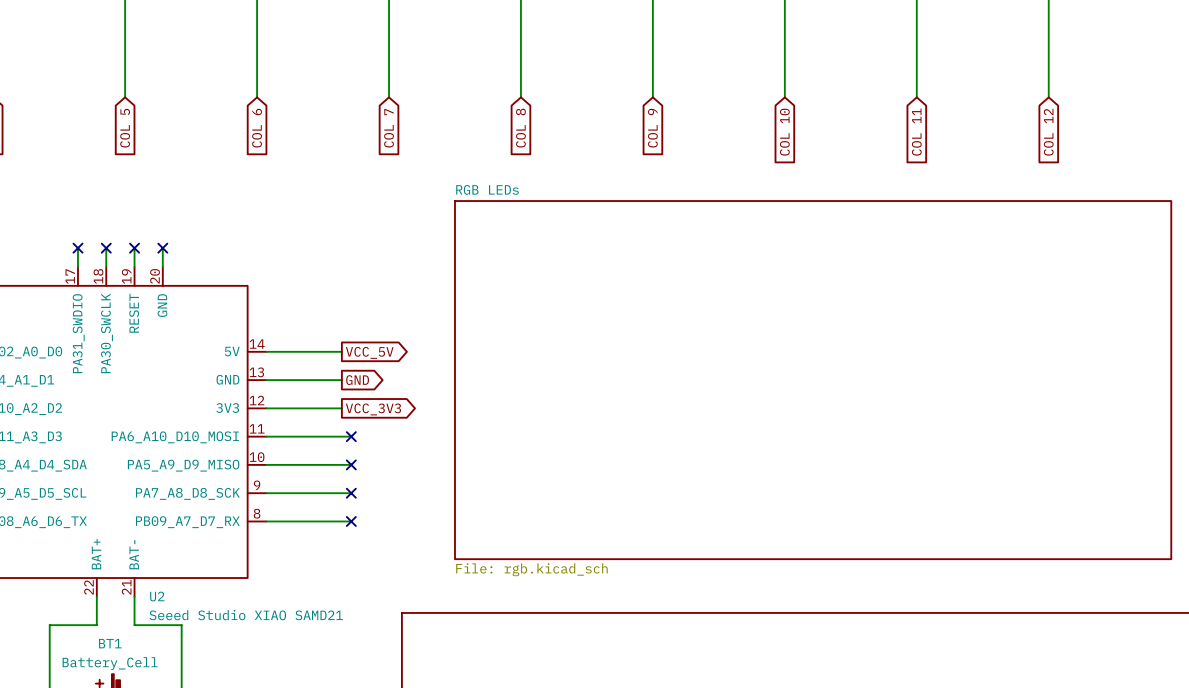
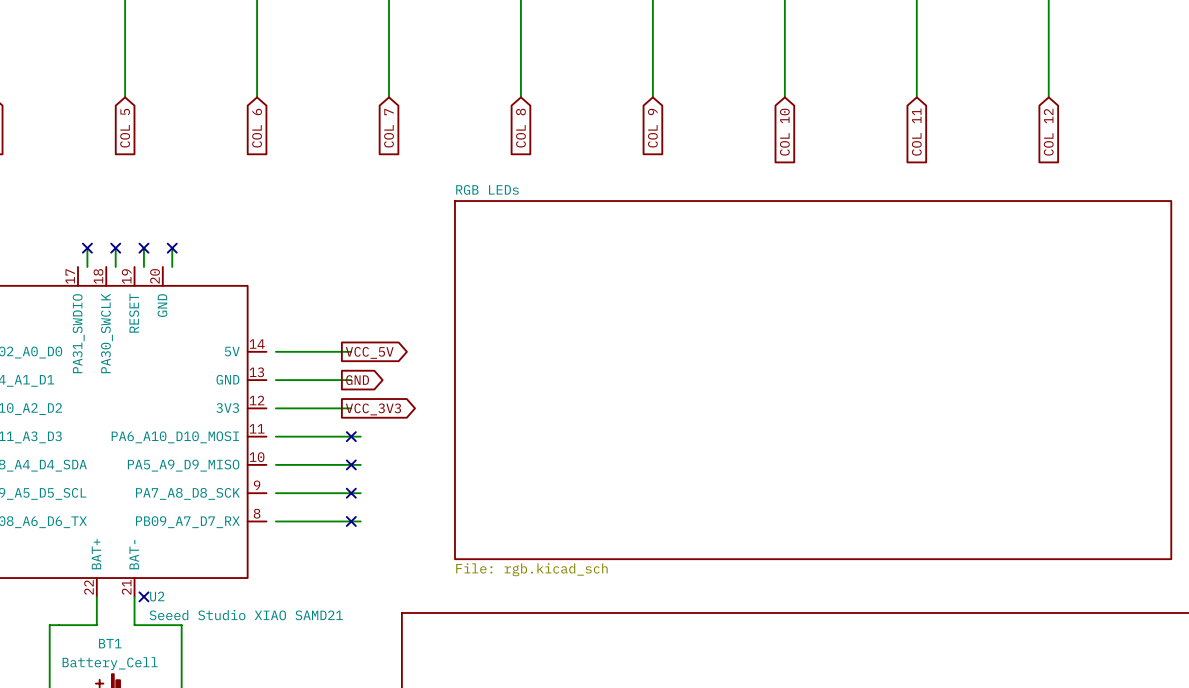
wire: (77, 248) (77, 267) -> (143, 248) (143, 267)
no-connect mark: (77, 248) -> none
no-connect mark: none -> (87, 248)
wire: (106, 248) (106, 267) -> (172, 248) (172, 267)
no-connect mark: (106, 248) -> none
no-connect mark: none -> (115, 248)
wire: (134, 248) (134, 267) -> (115, 248) (115, 267)
no-connect mark: (134, 248) -> none
no-connect mark: none -> (143, 248)
wire: (162, 248) (162, 267) -> (87, 248) (87, 267)
no-connect mark: (162, 248) -> none
no-connect mark: none -> (172, 248)
wire: (266, 351) (275, 351) -> (341, 351) (351, 351)
wire: (266, 380) (275, 380) -> (341, 380) (351, 380)
wire: (266, 408) (275, 408) -> (341, 408) (351, 408)
wire: (266, 436) (275, 436) -> (351, 436) (360, 436)
wire: (266, 464) (275, 464) -> (351, 464) (360, 464)
wire: (266, 493) (275, 493) -> (351, 493) (360, 493)
wire: (266, 521) (275, 521) -> (351, 521) (360, 521)
no-connect mark: none -> (143, 596)

